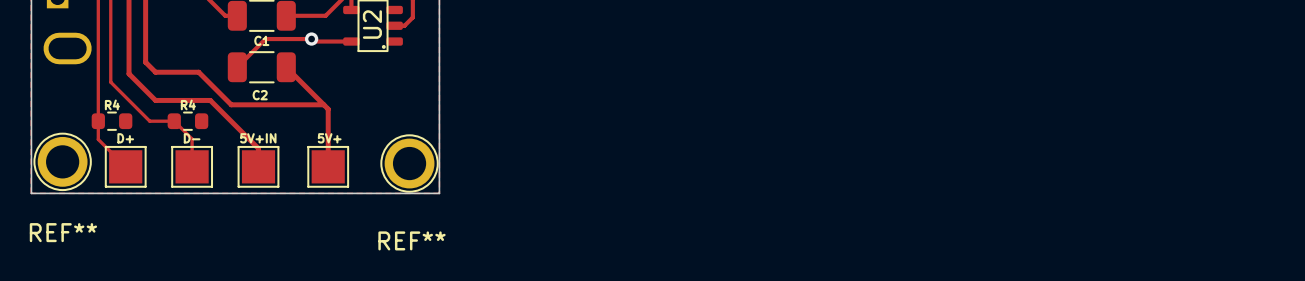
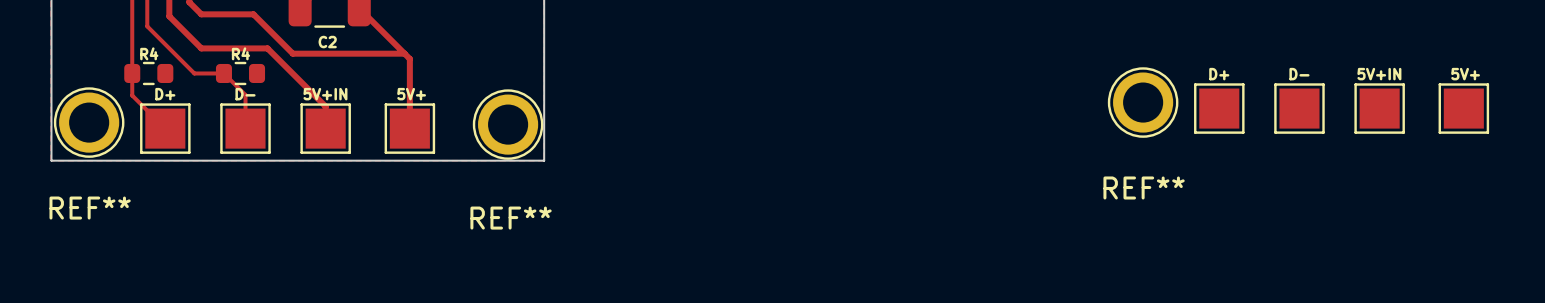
REF**: none -> (1143, 102)
D+: none -> (1219, 108)
D-: none -> (1299, 108)
5V+IN: none -> (1379, 108)
5V+: none -> (1463, 108)

